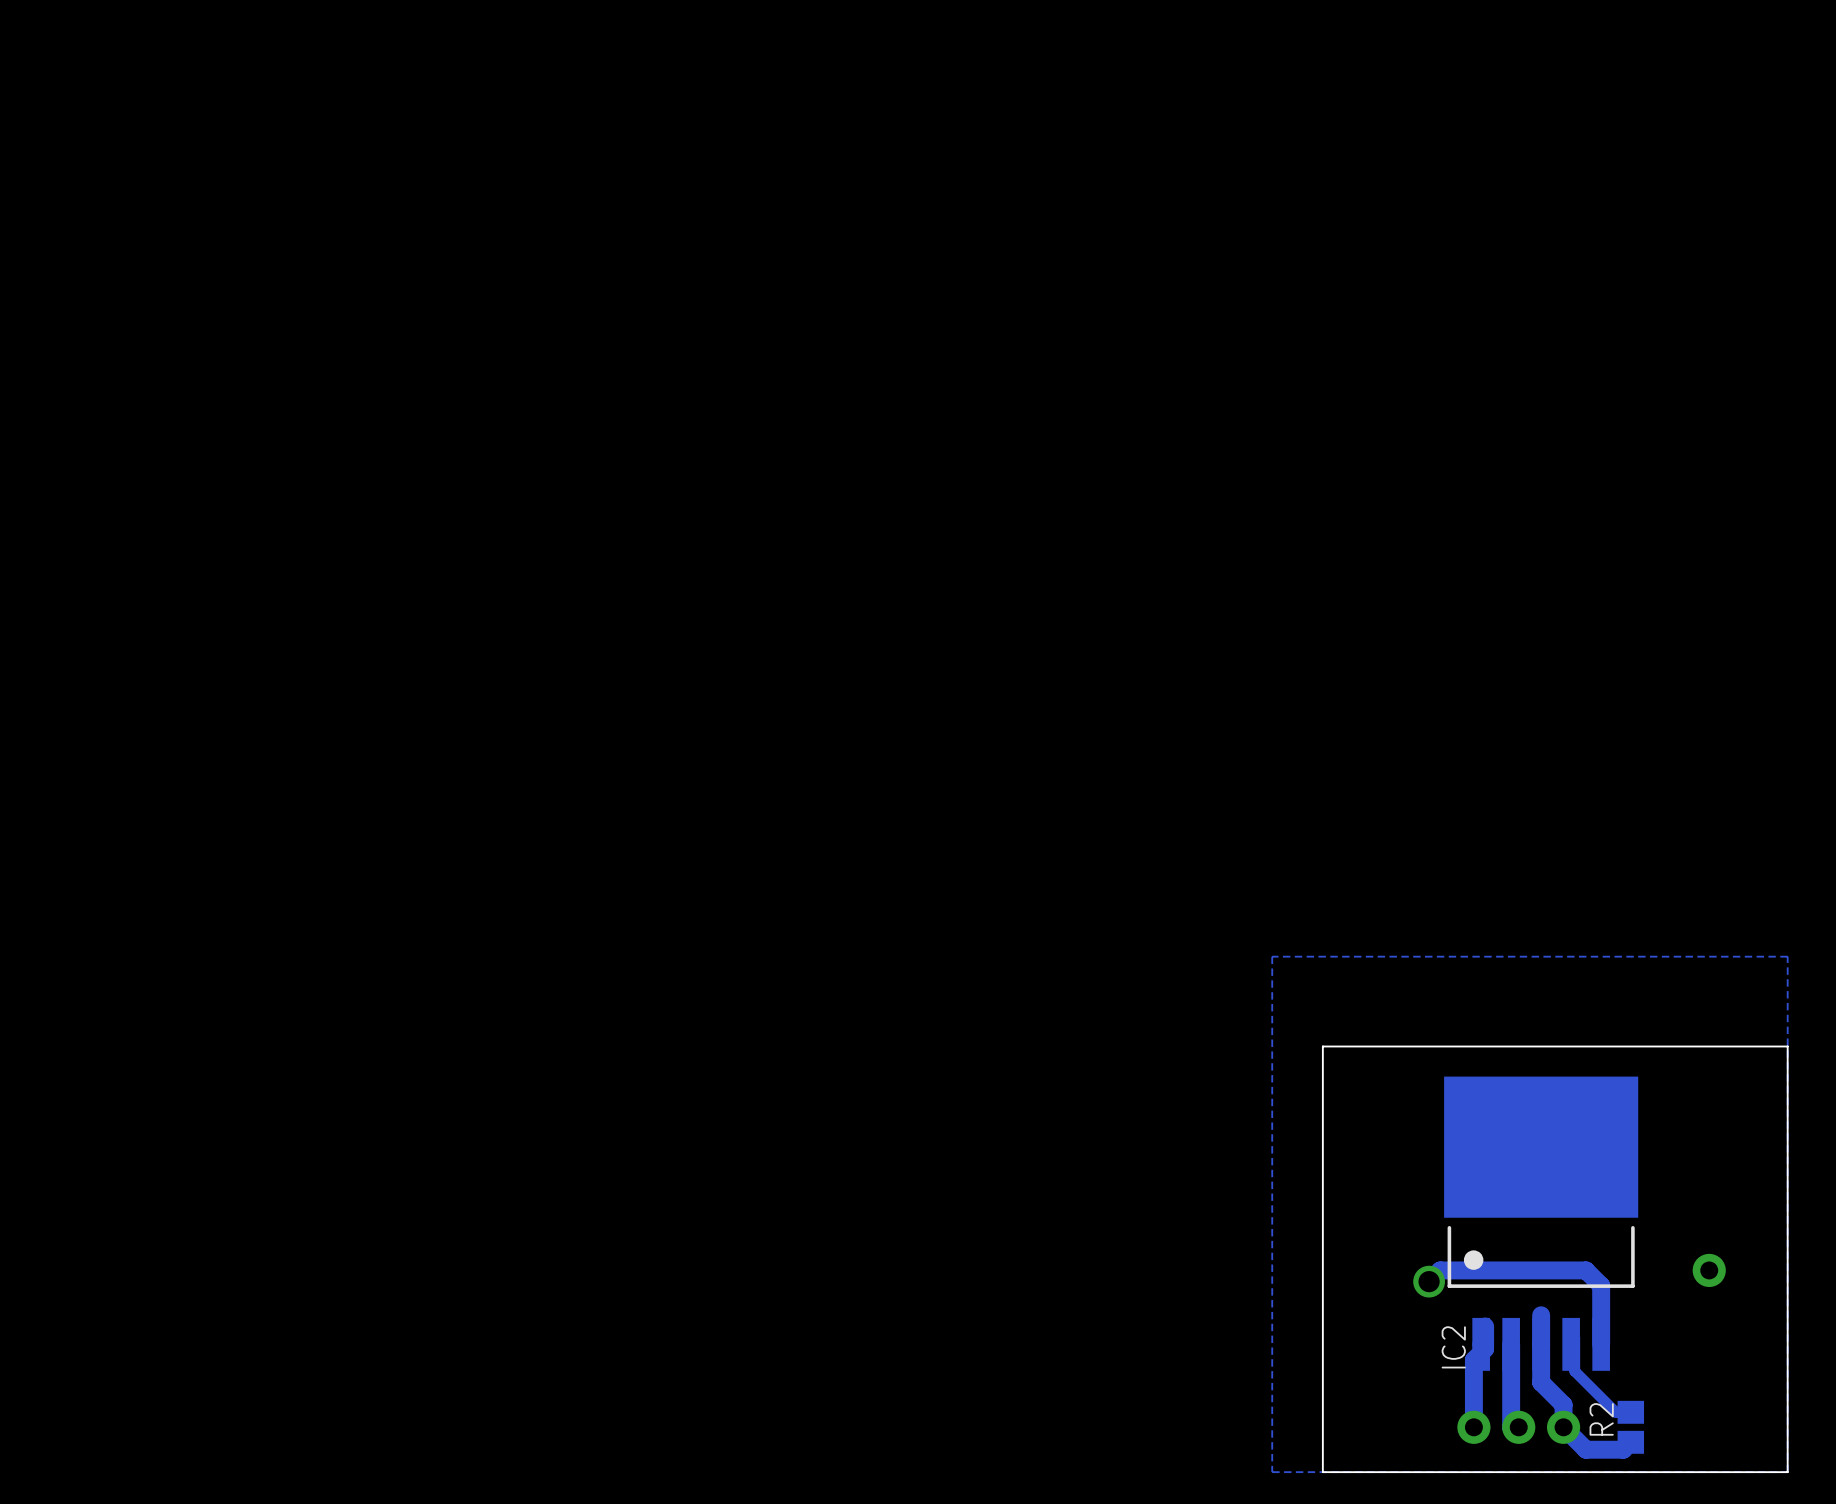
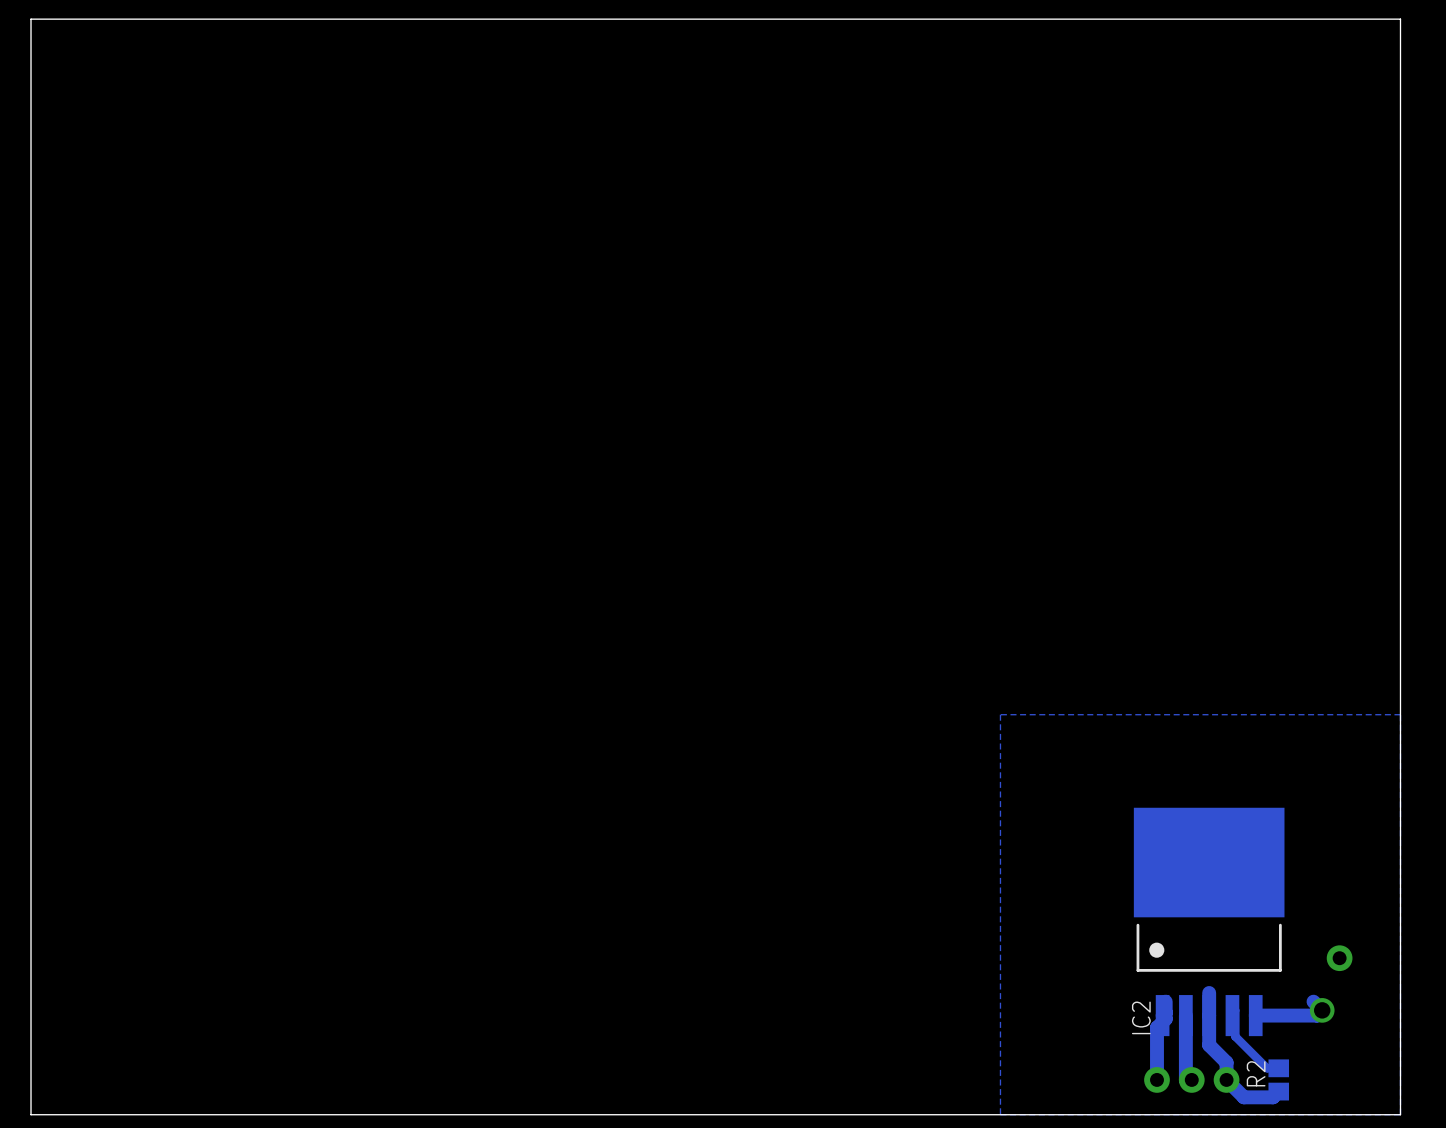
board edge: (1787, 1046) (1322, 1046) (1322, 1472) -> (1400, 784) (1400, 19) (31, 19) (31, 1114) (1039, 1114)
track: (1429, 1281) (1440, 1270) (1585, 1270) (1601, 1285) (1601, 1344) -> (1313, 1001) (1322, 1010) (1317, 1015) (1255, 1015)
via: (1429, 1281) -> none
via: none -> (1322, 1010)

